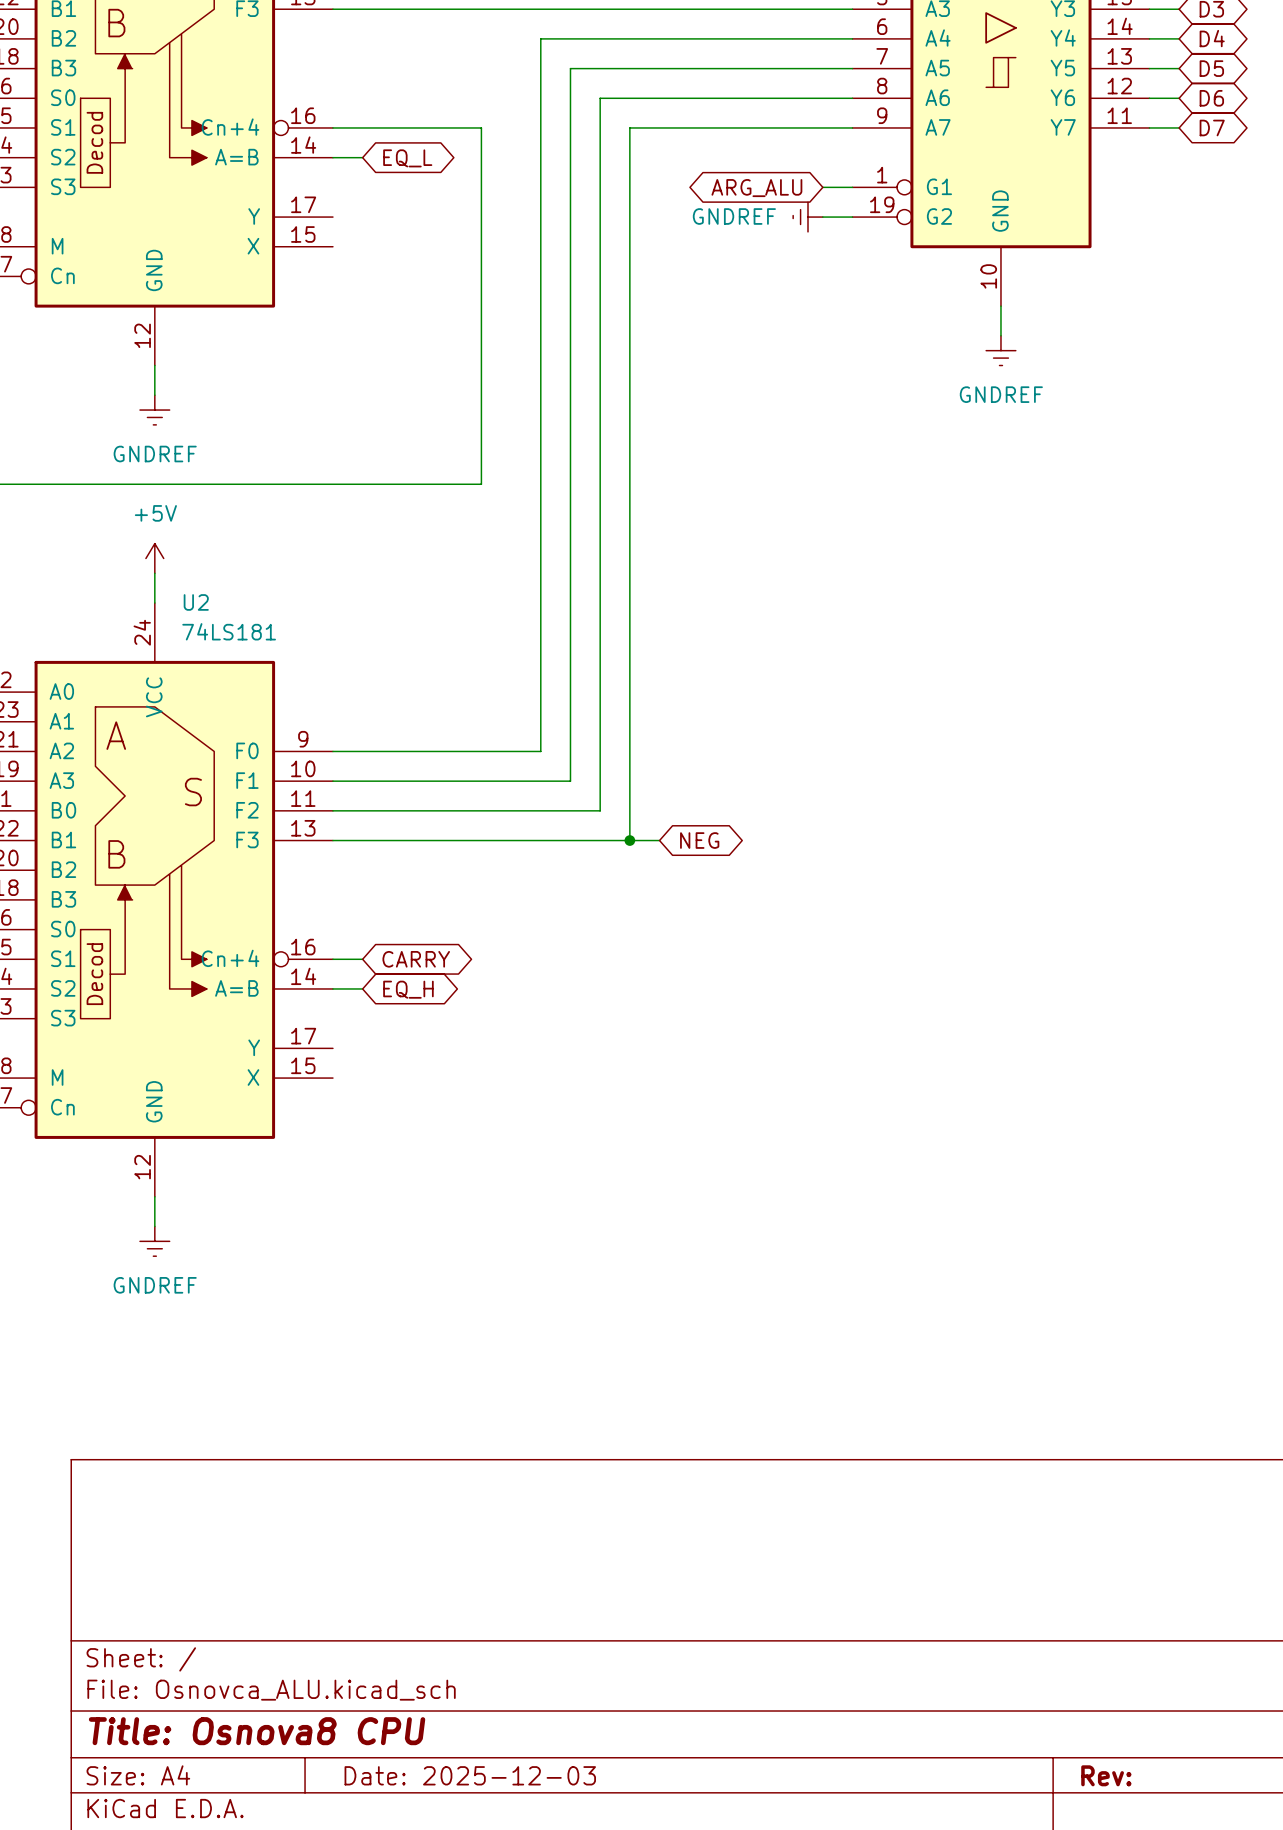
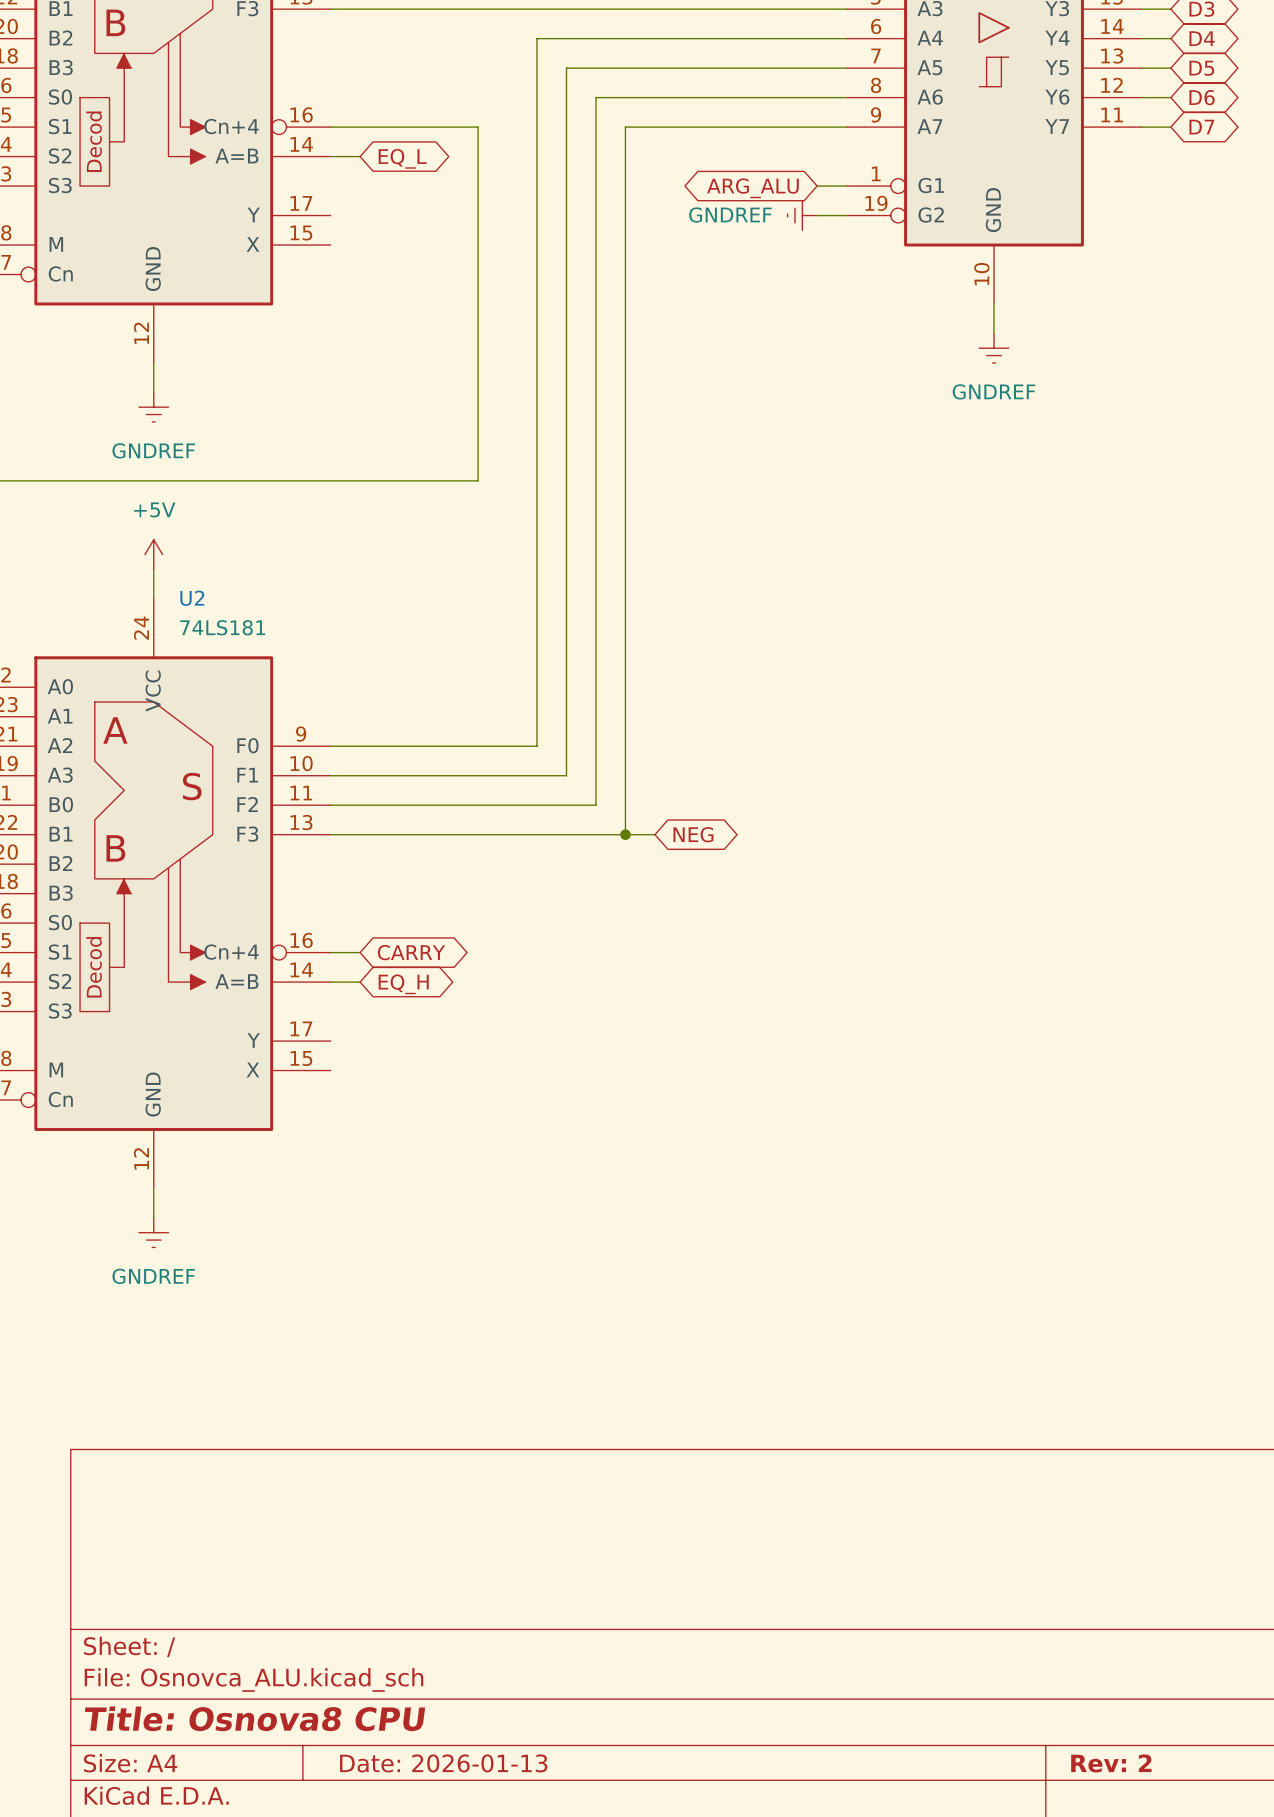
title block: Date: 2025-12-03 (470, 1775) -> Date: 2026-01-13 (443, 1763)
title block: Rev: (1106, 1775) -> Rev: 2 (1111, 1763)

